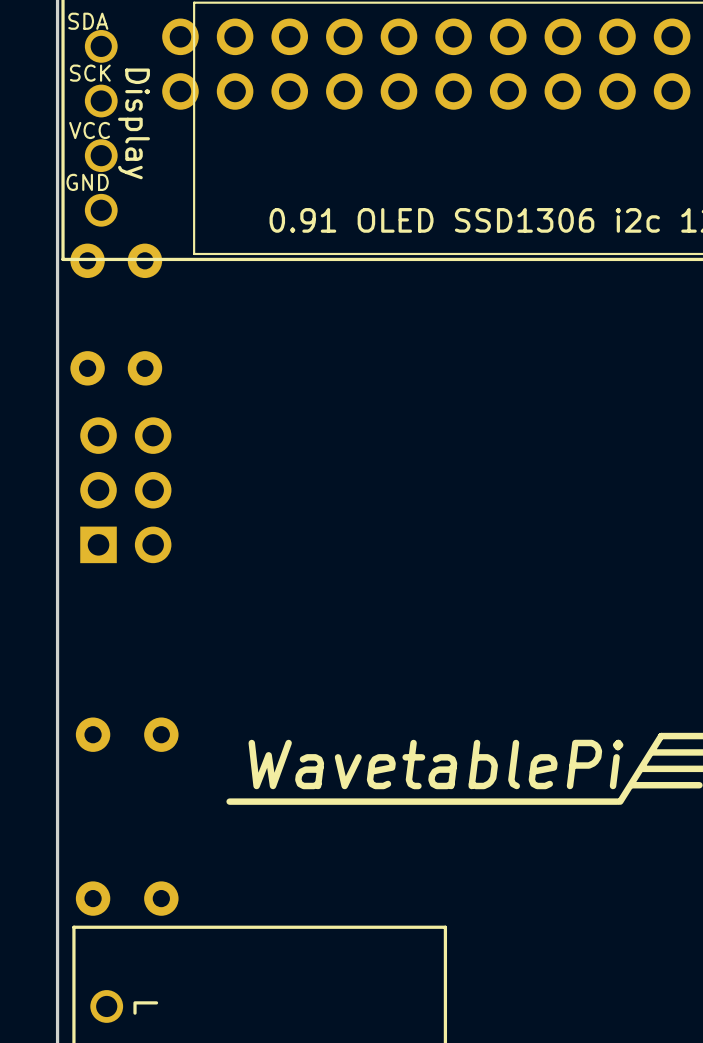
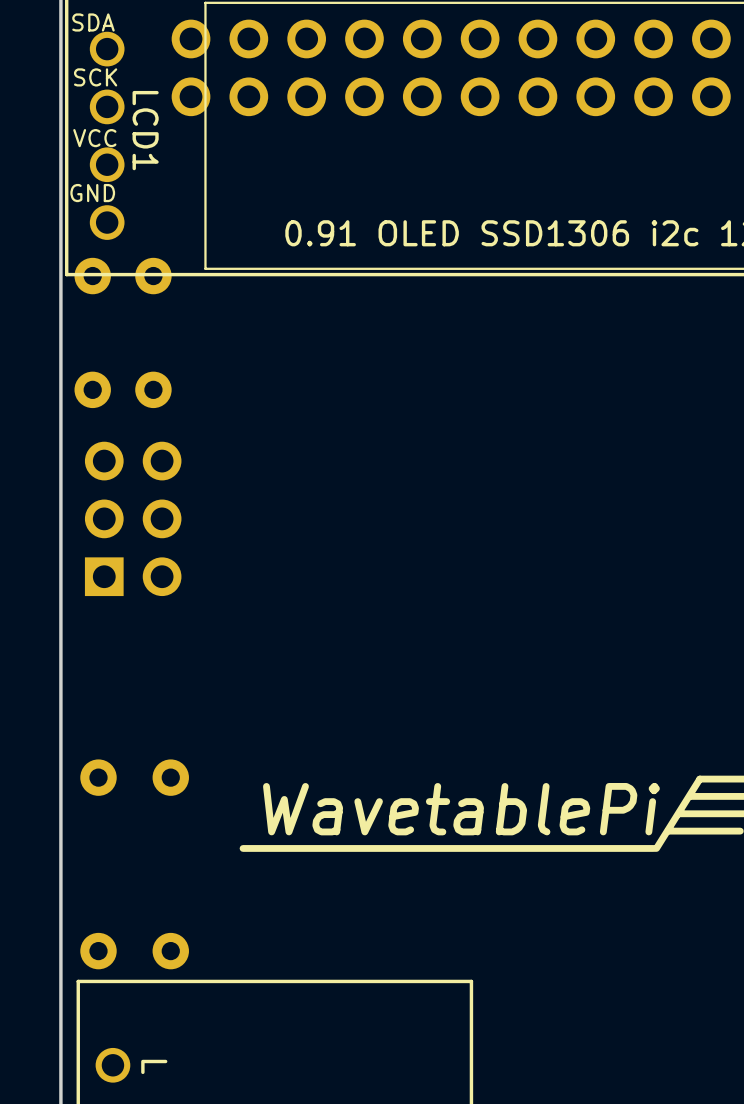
Display name: Display (133, 123) -> LCD1 (145, 130)

